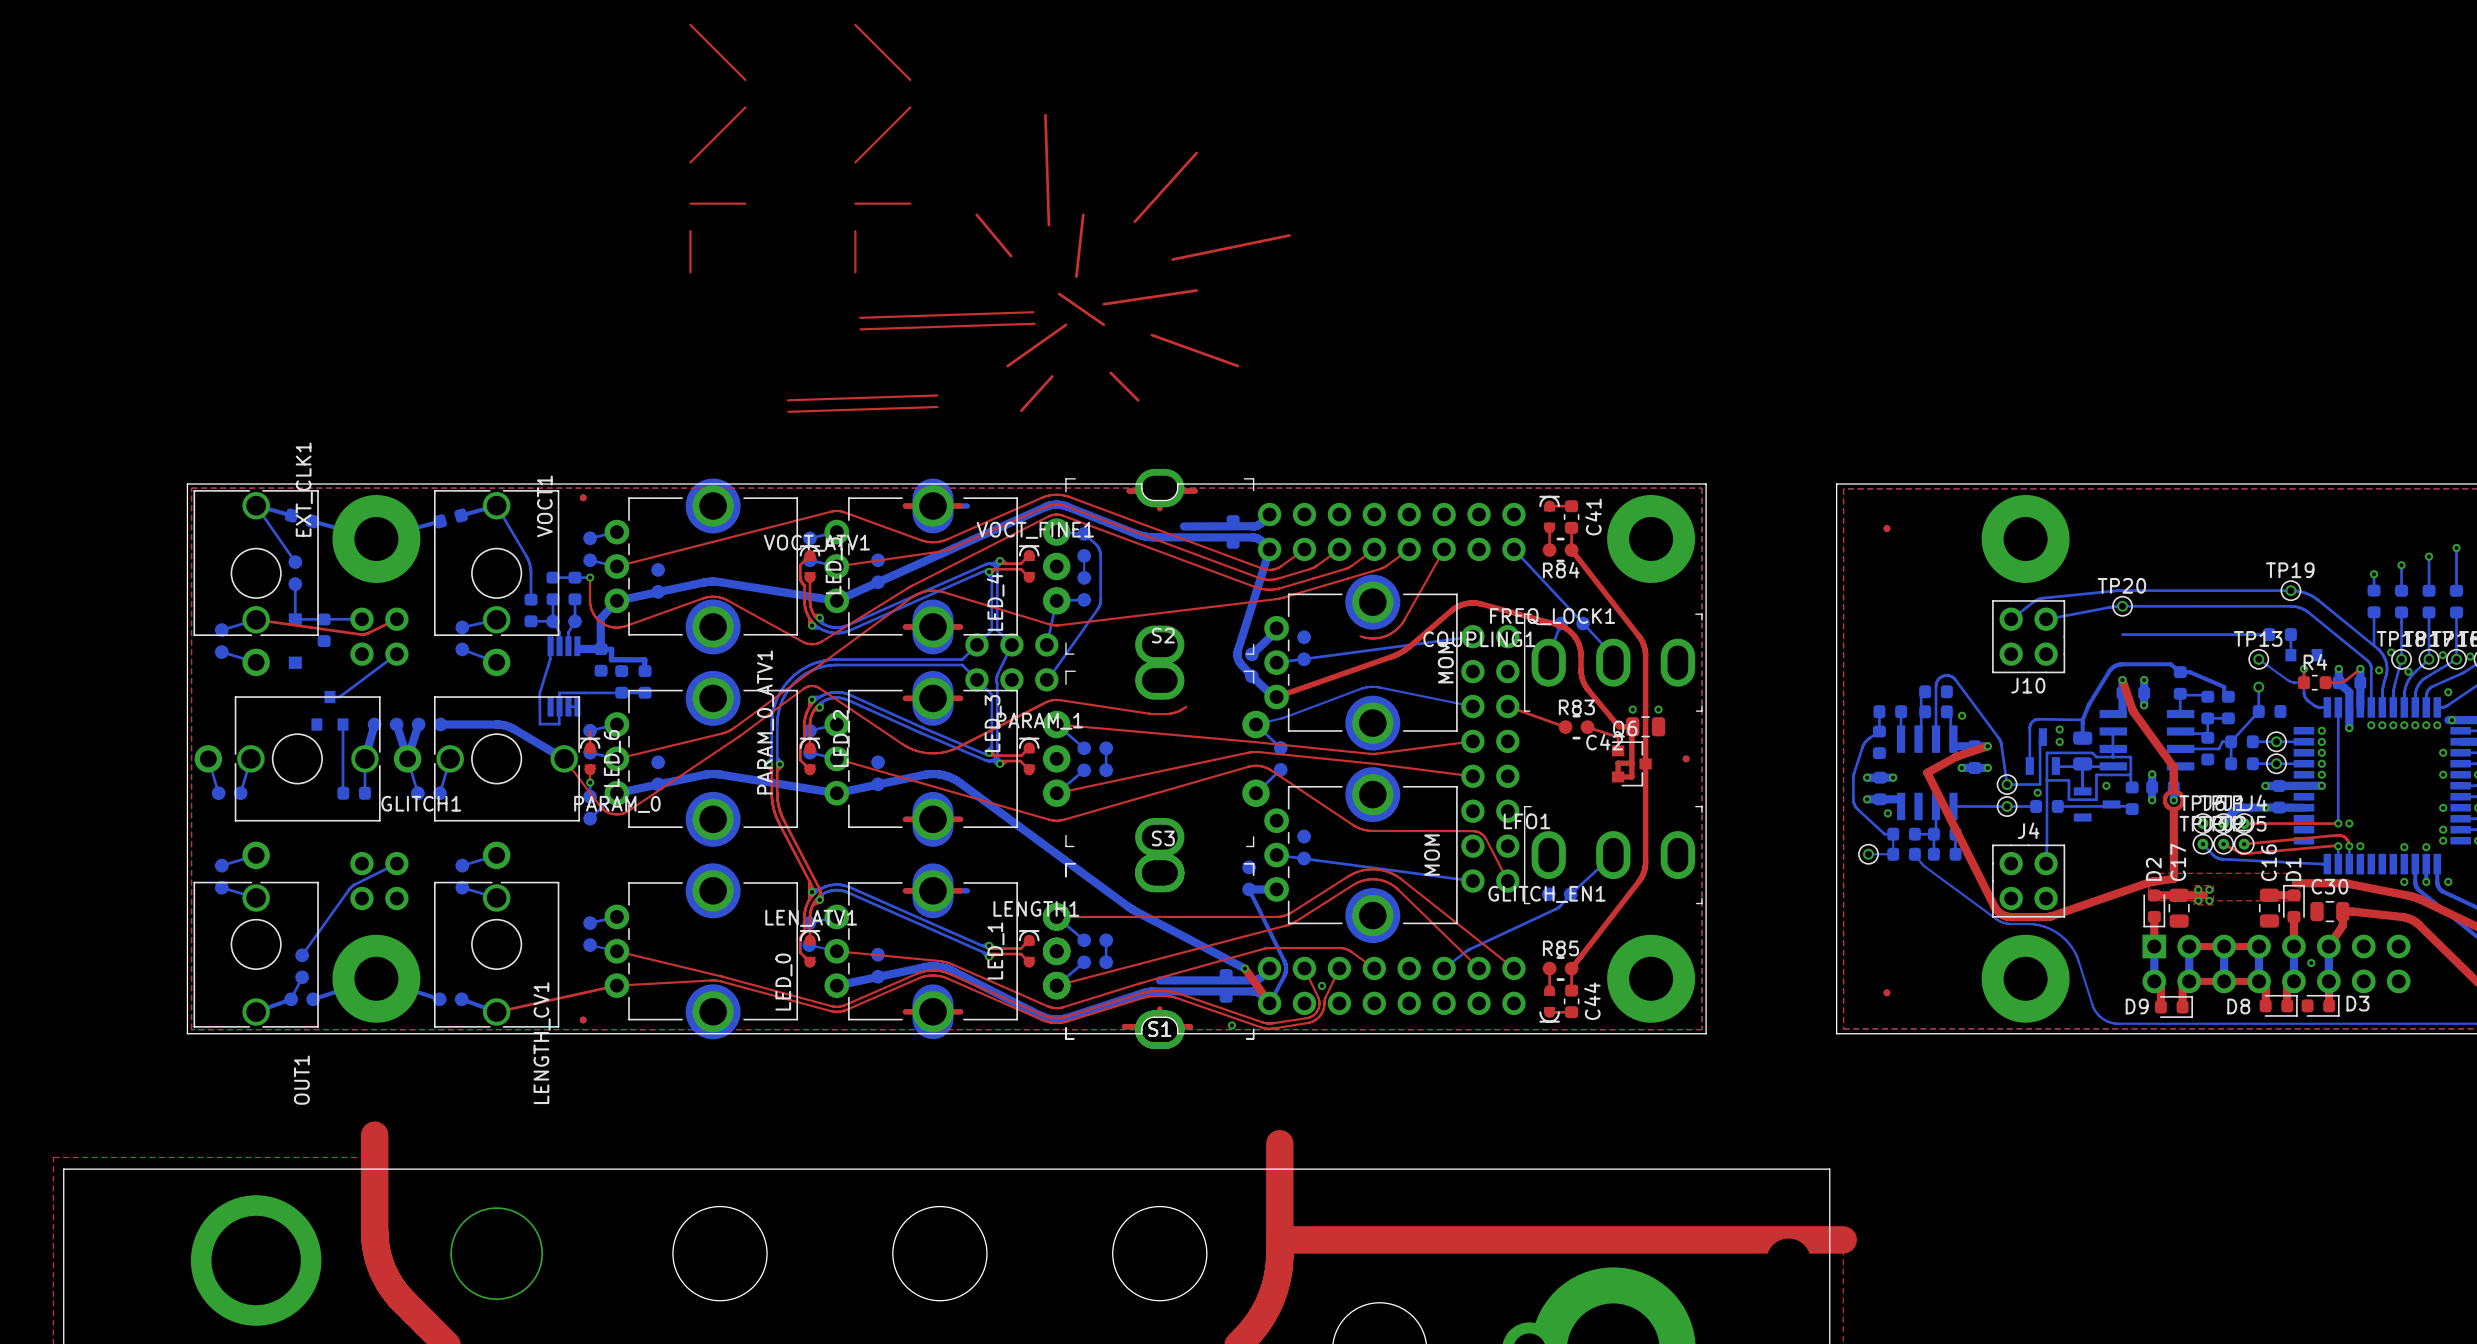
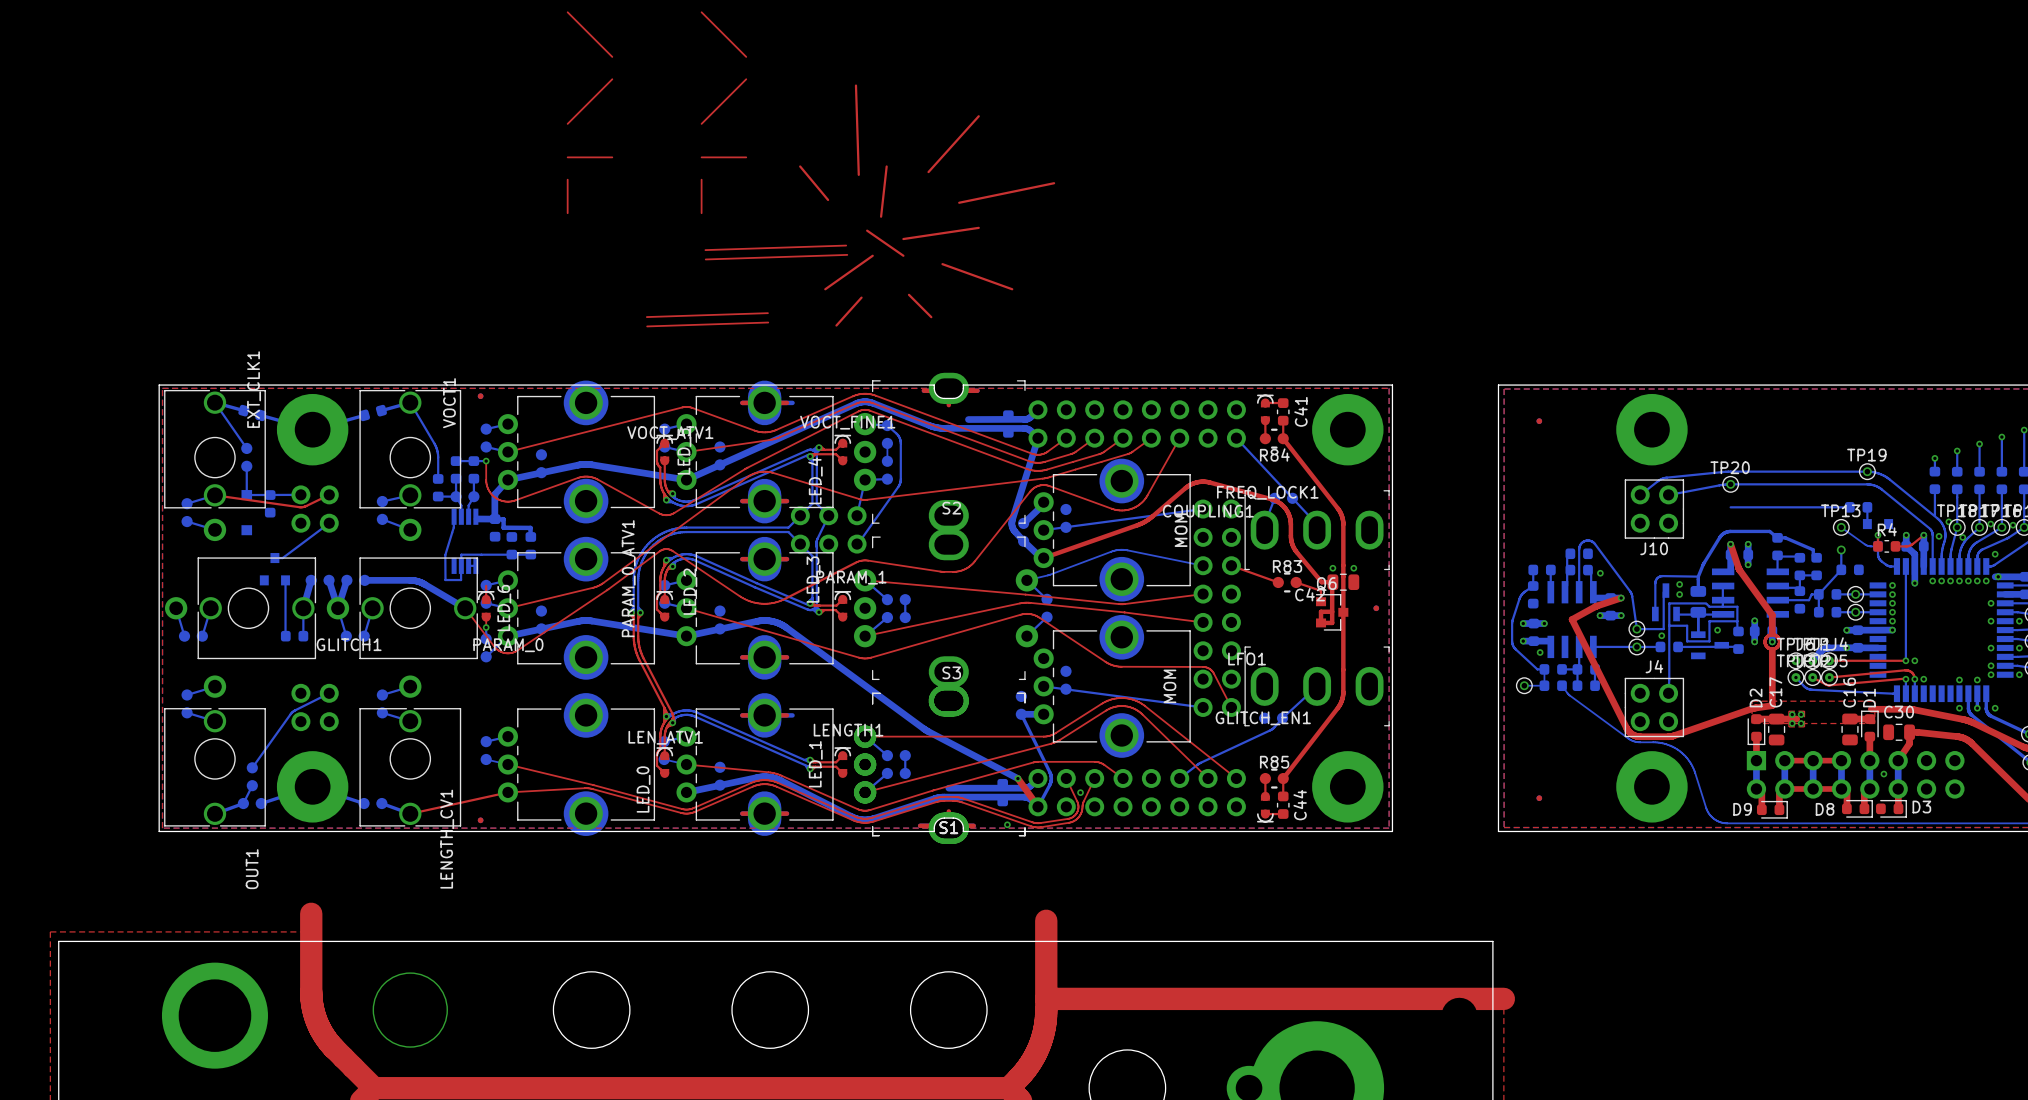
top track: none -> (1111, 508) (1048, 485) (1036, 486) (1030, 491) (970, 565)

